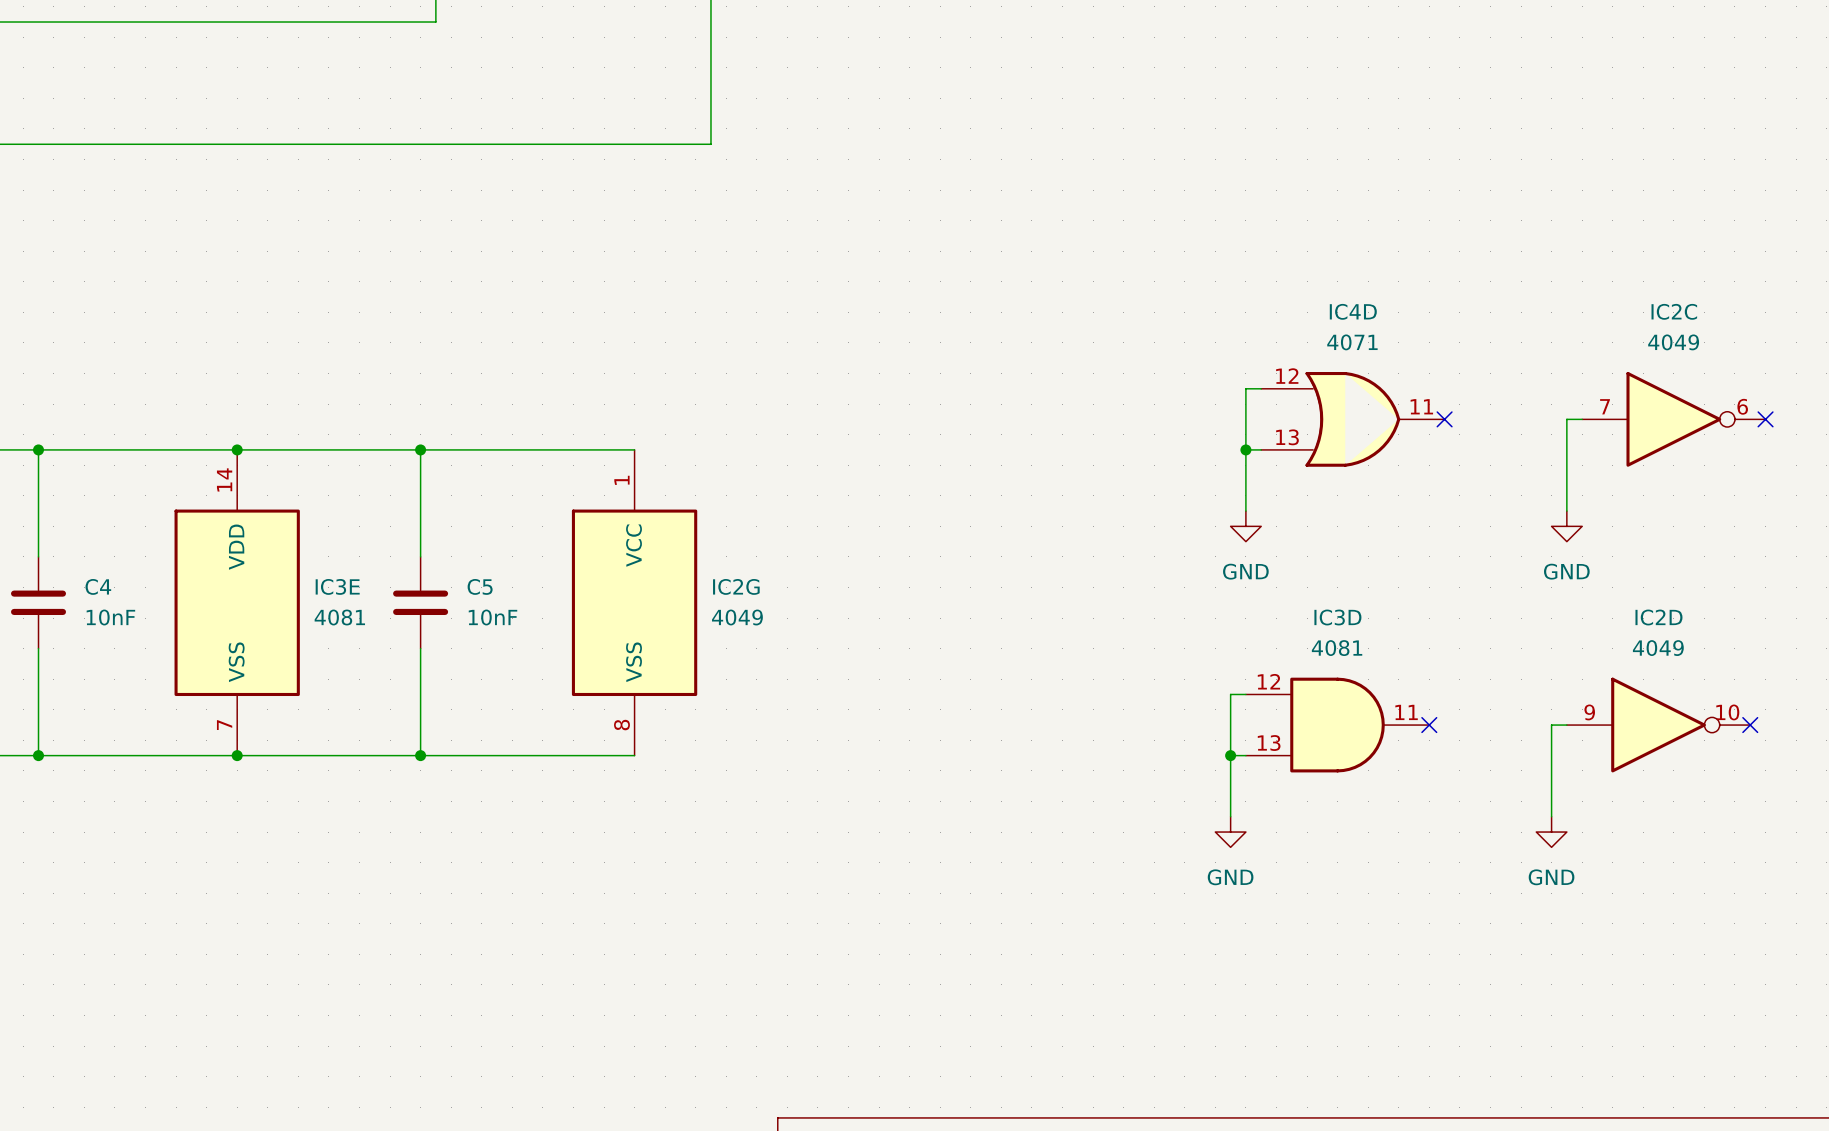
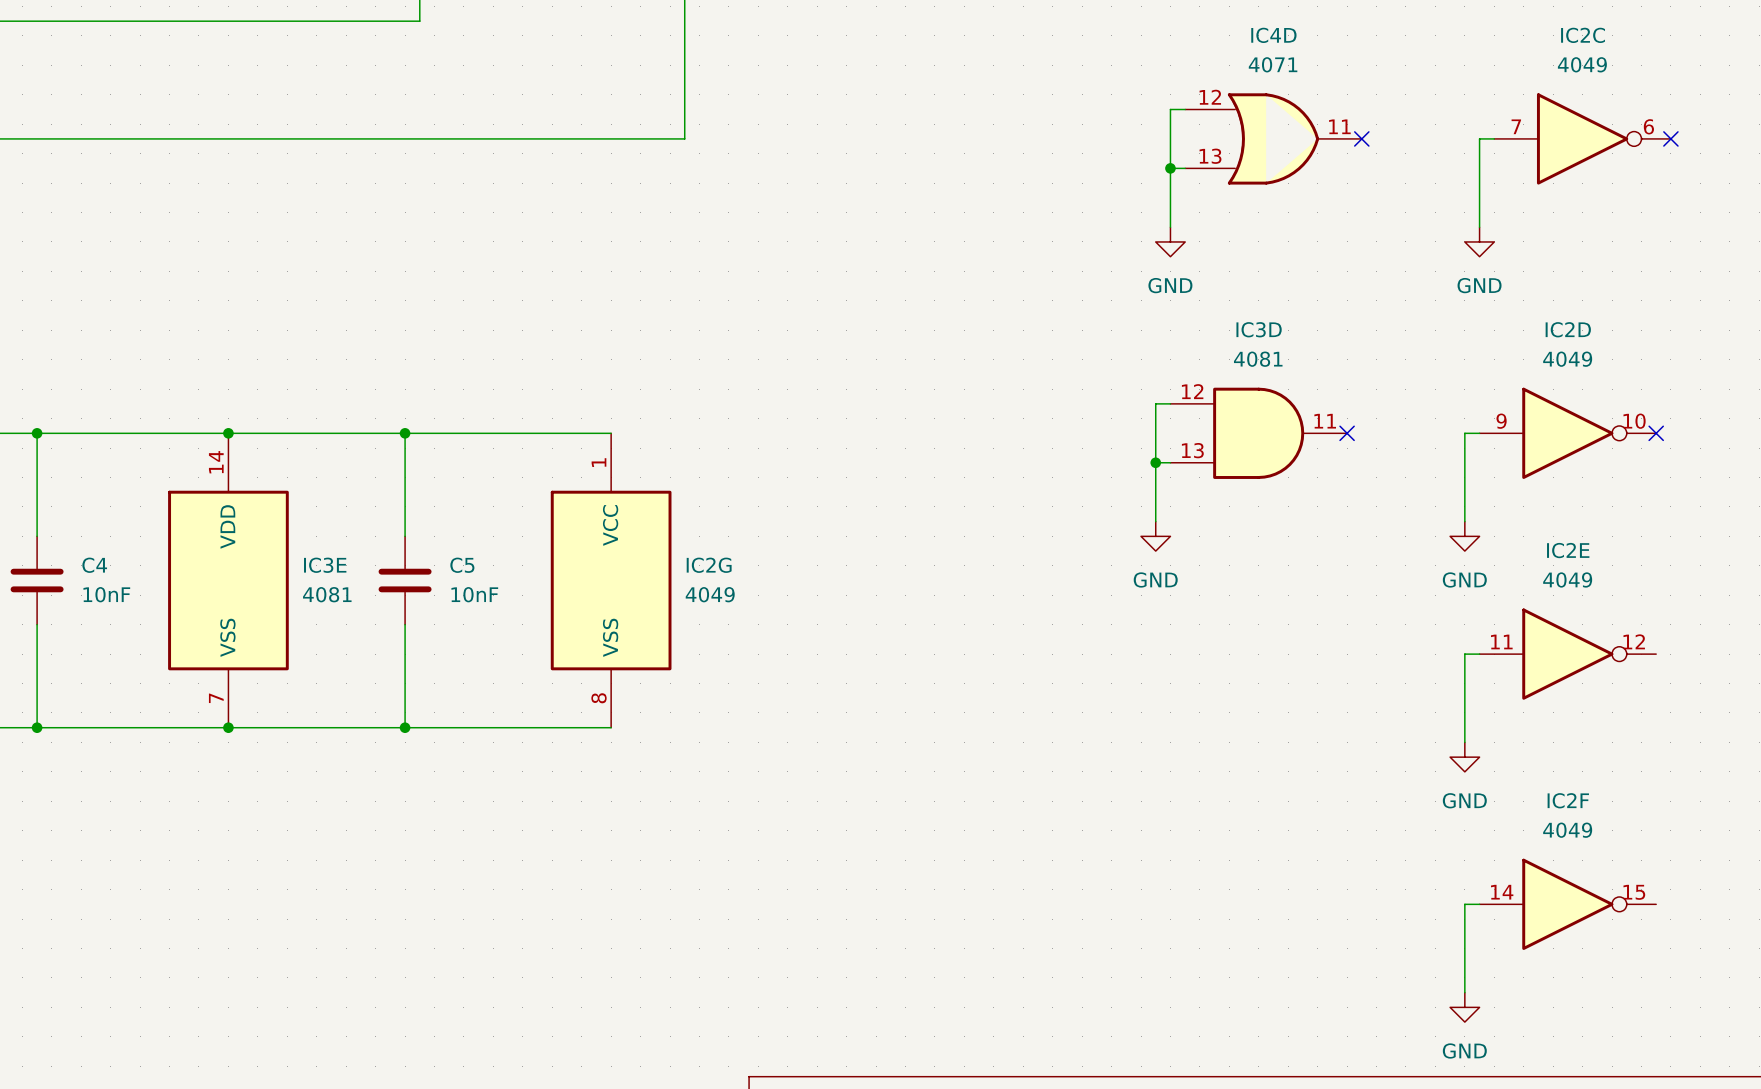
no-connect mark: none -> (1361, 138)
no-connect mark: none -> (1670, 138)
junction: none -> (1170, 168)
power symbol: none -> GND (1170, 241)
power symbol: none -> GND (1479, 241)
wire: (1261, 388) (1245, 388) (1245, 511) -> (1185, 109) (1170, 109) (1170, 227)
IC4D position: (1352, 419) -> (1273, 138)
no-connect mark position: (1444, 419) -> (1347, 433)
wire: (1582, 419) (1566, 419) (1566, 511) -> (1494, 138) (1479, 138) (1479, 227)
IC2C position: (1673, 419) -> (1582, 138)
no-connect mark position: (1765, 419) -> (1656, 433)
wire: (1245, 449) (1261, 449) -> (1170, 168) (1185, 168)
junction position: (1245, 449) -> (1155, 462)
power symbol position: GND (1245, 526) -> GND (1155, 536)
power symbol position: GND (1566, 526) -> GND (1464, 536)
wire: none -> (1479, 654) (1464, 654) (1464, 742)
IC2E: none -> 4049 (1567, 654)
wire: (1245, 694) (1230, 694) (1230, 816) -> (1170, 403) (1155, 403) (1155, 521)
IC3D position: (1337, 725) -> (1258, 433)
no-connect mark: (1429, 725) -> none
wire: (1566, 725) (1551, 725) (1551, 816) -> (1479, 433) (1464, 433) (1464, 521)
IC2D position: (1658, 725) -> (1567, 433)
no-connect mark: (1750, 725) -> none
wire: (1230, 755) (1245, 755) -> (1155, 462) (1170, 462)
junction: (1230, 755) -> none
power symbol: GND (1230, 832) -> none
power symbol position: GND (1551, 832) -> GND (1464, 757)
wire: none -> (1479, 904) (1464, 904) (1464, 992)
IC2F: none -> 4049 (1567, 904)
power symbol: none -> GND (1464, 1007)

